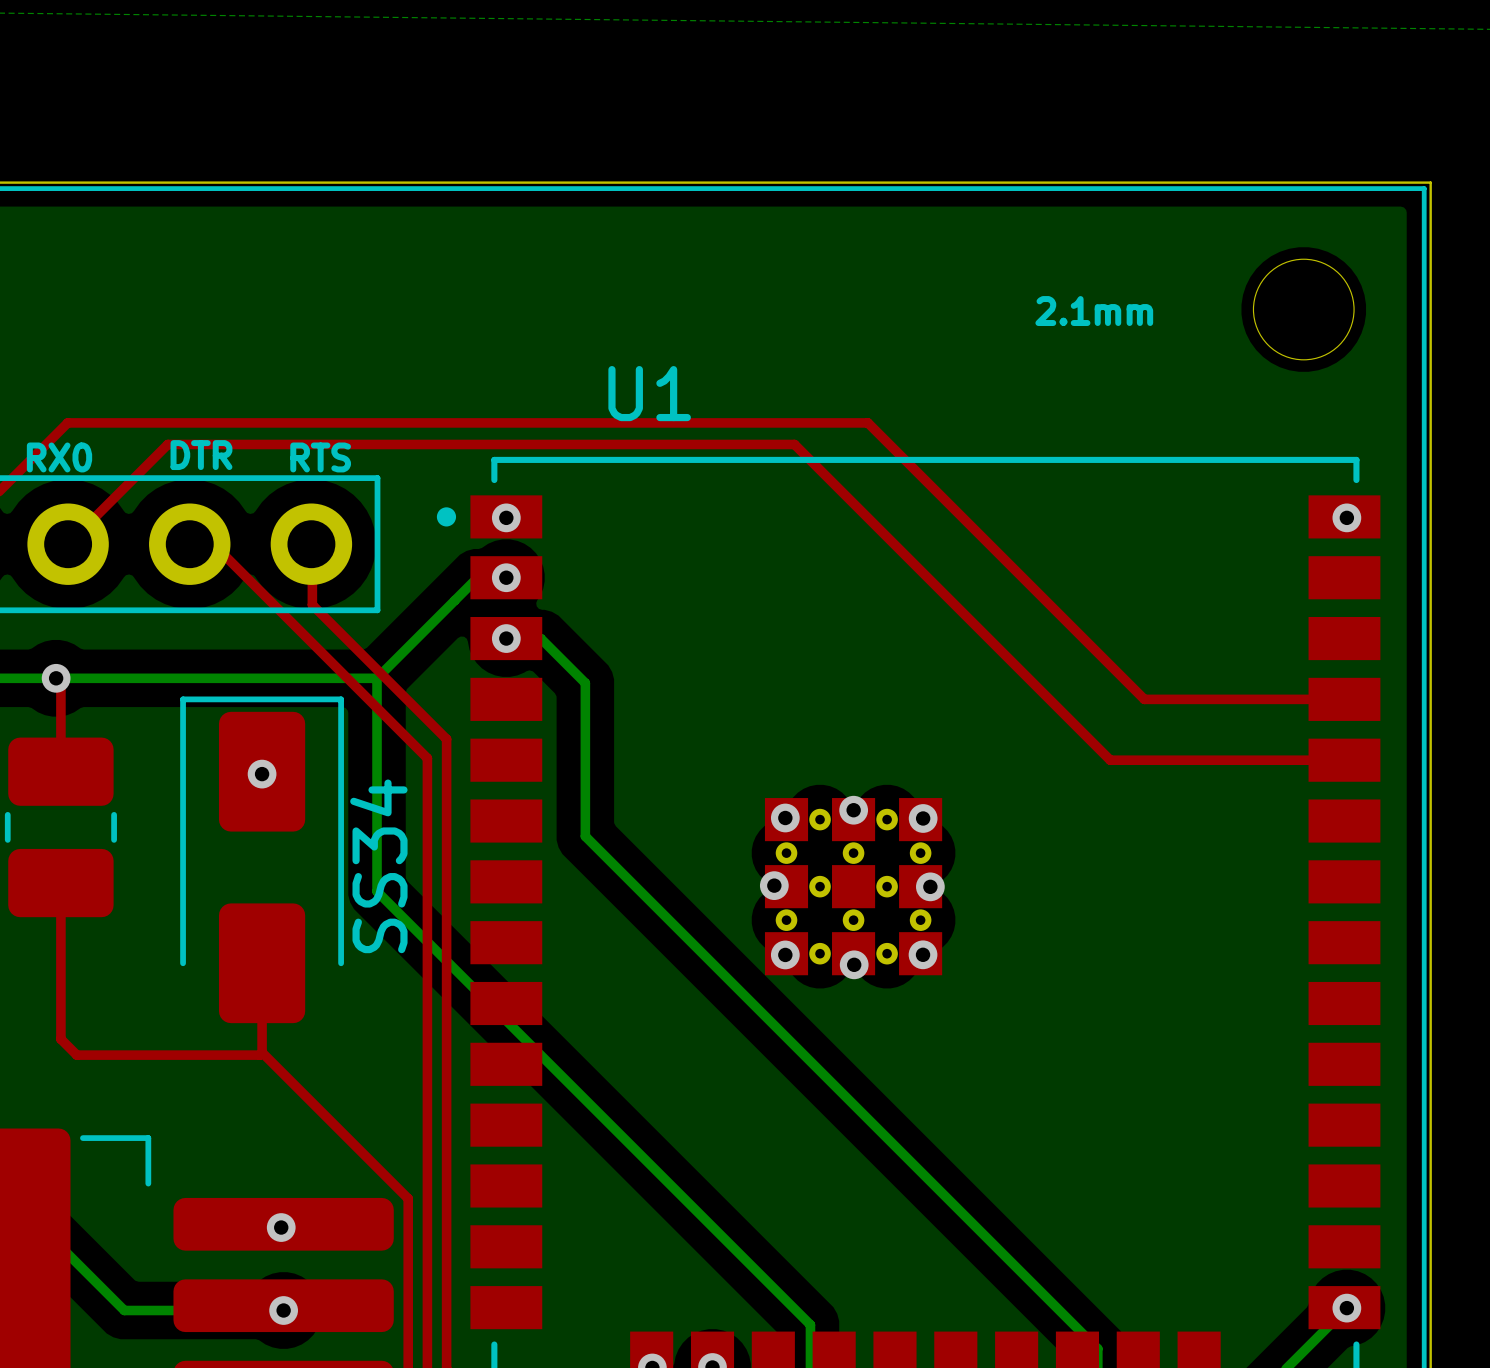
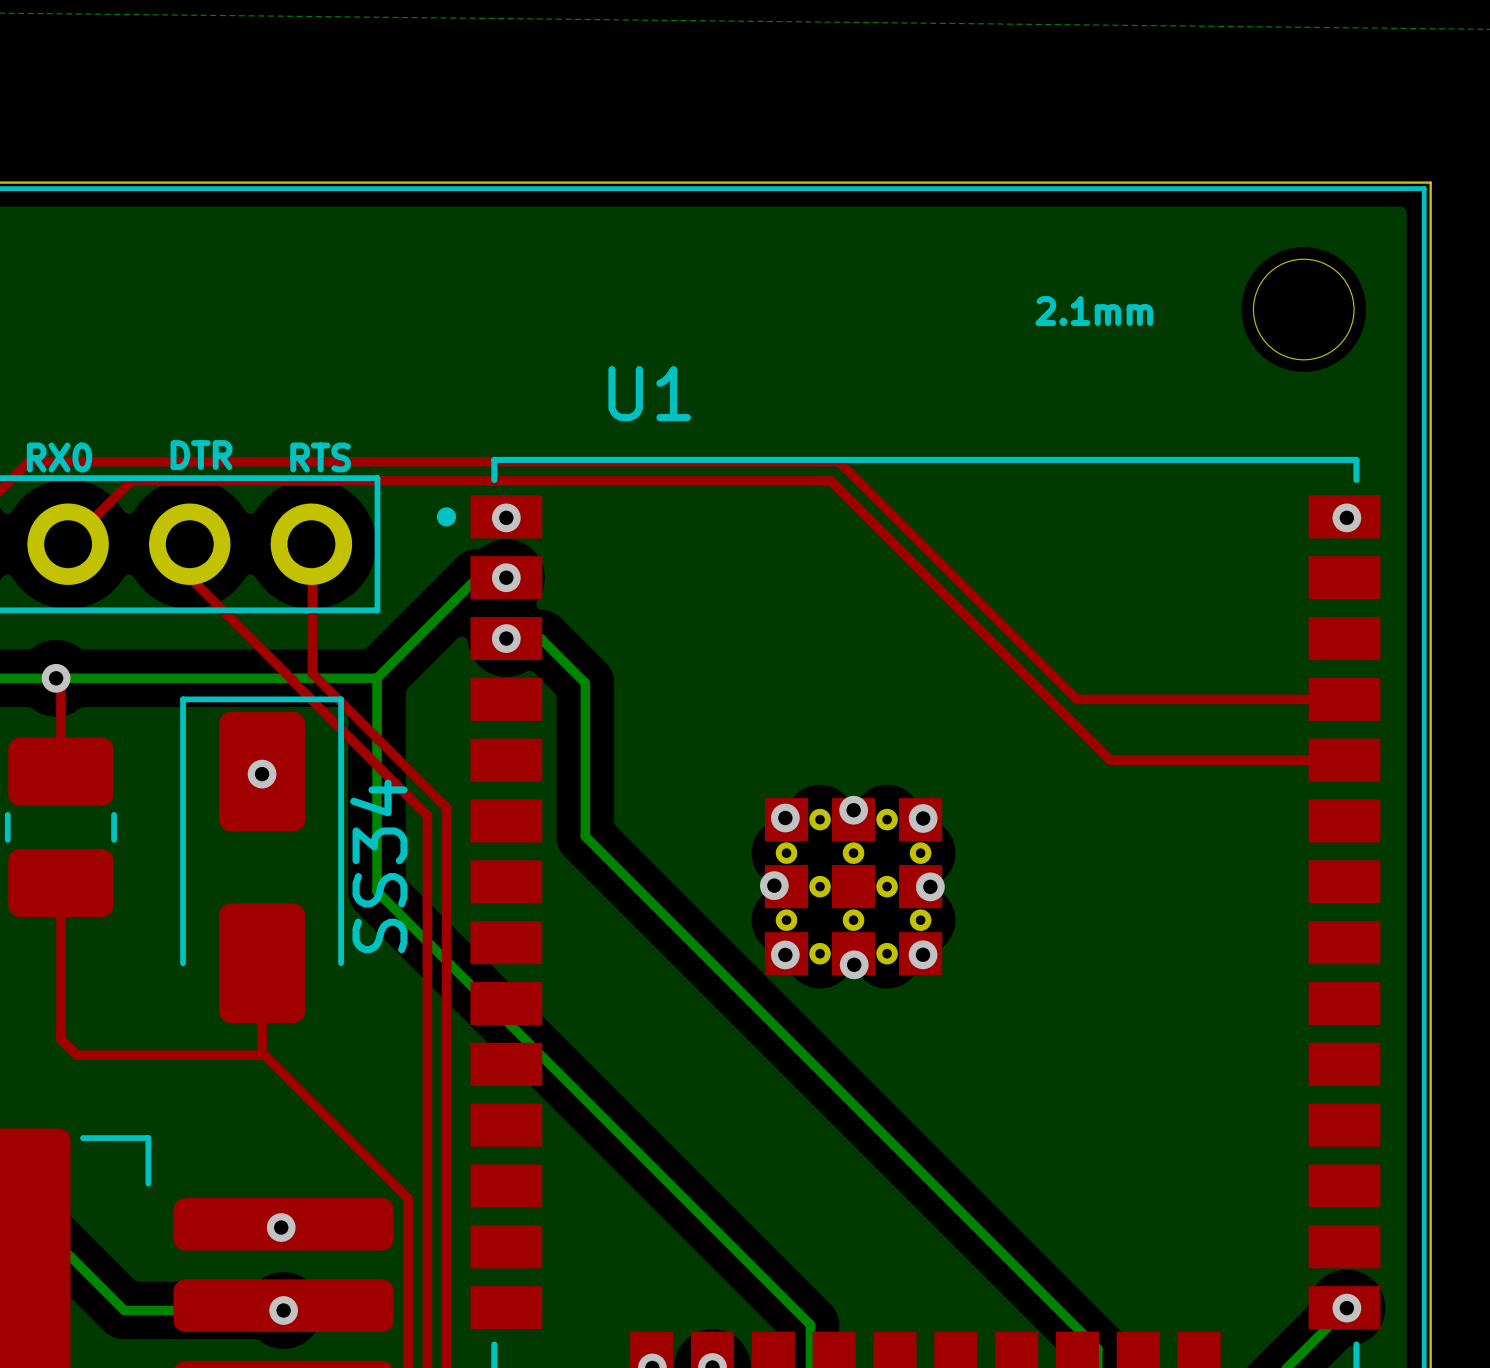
top track: (28, 461) (67, 422) (867, 422) (1144, 699) -> (28, 461) (838, 461) (1076, 699) (1144, 699)
top track: (131, 480) (167, 444) (794, 444) (831, 480) -> (131, 480) (831, 480)
top track: (189, 544) (213, 544) (427, 758) (427, 815) -> (293, 681) (427, 815)
top track: none -> (189, 544) (189, 577) (293, 680)
top track: (312, 604) (446, 739) (446, 807) -> (312, 604) (312, 673) (446, 807)

